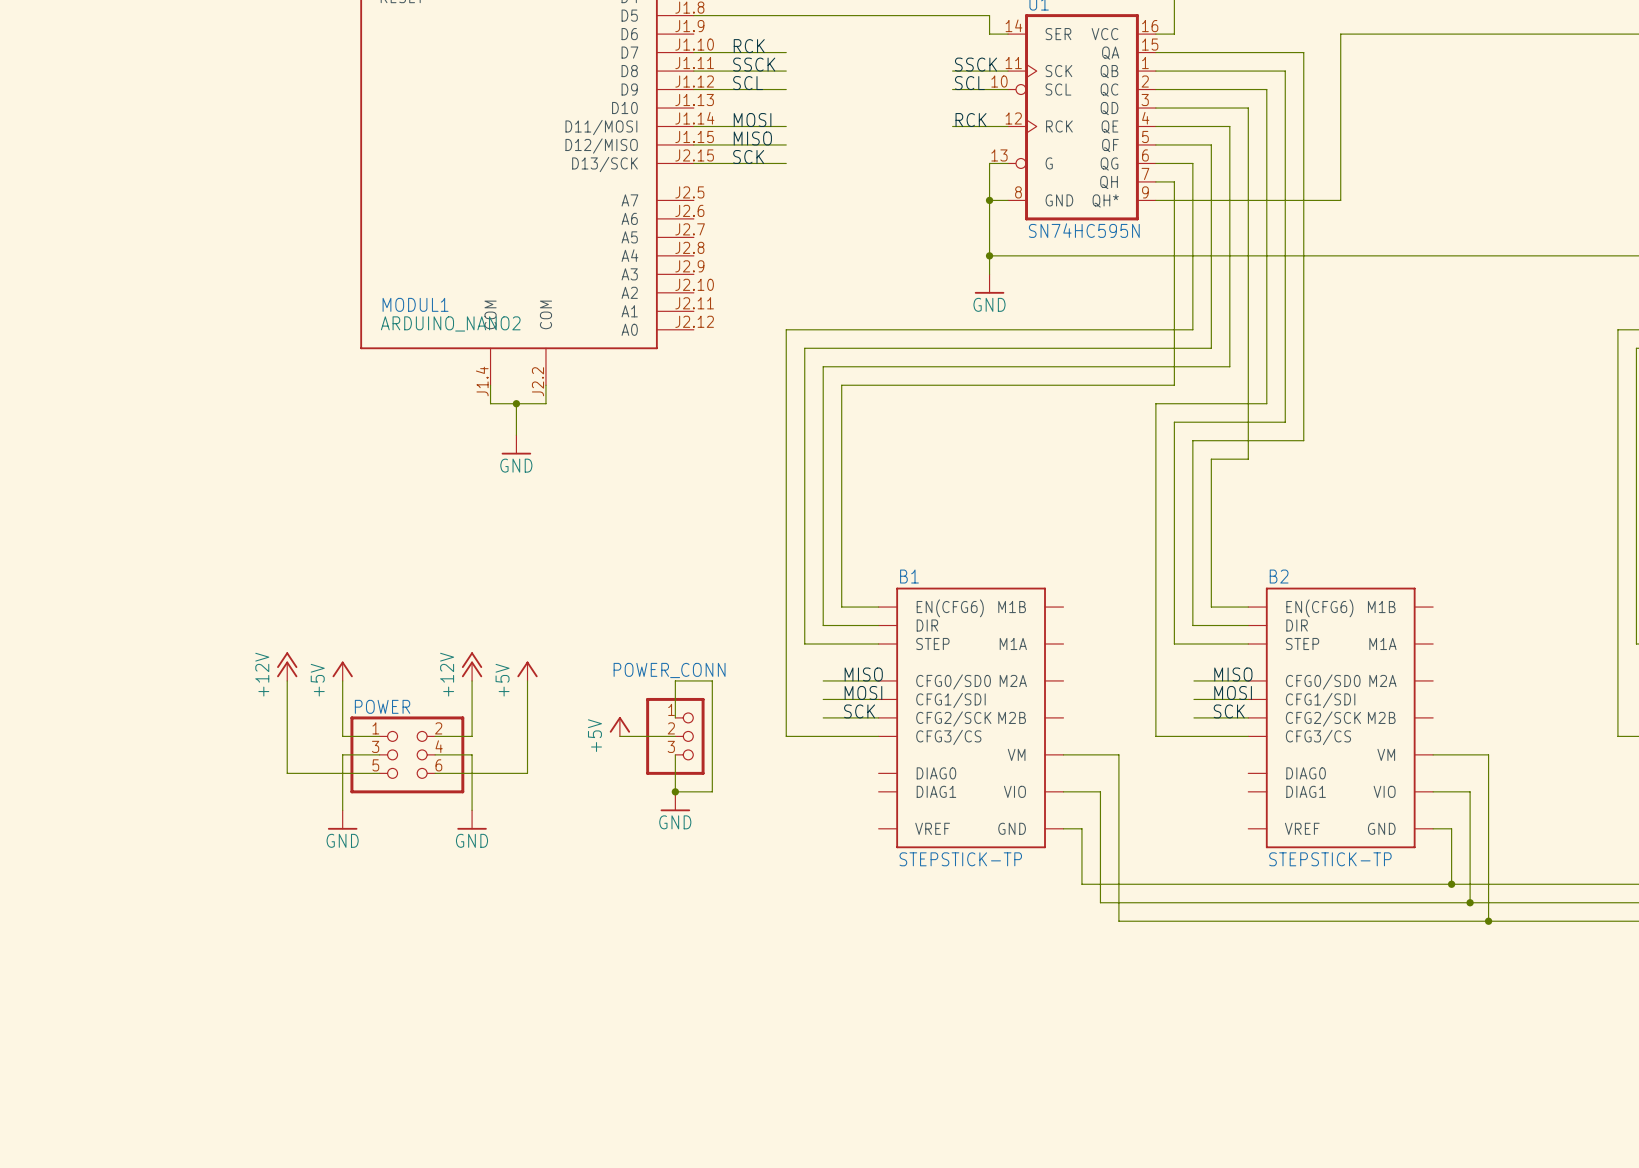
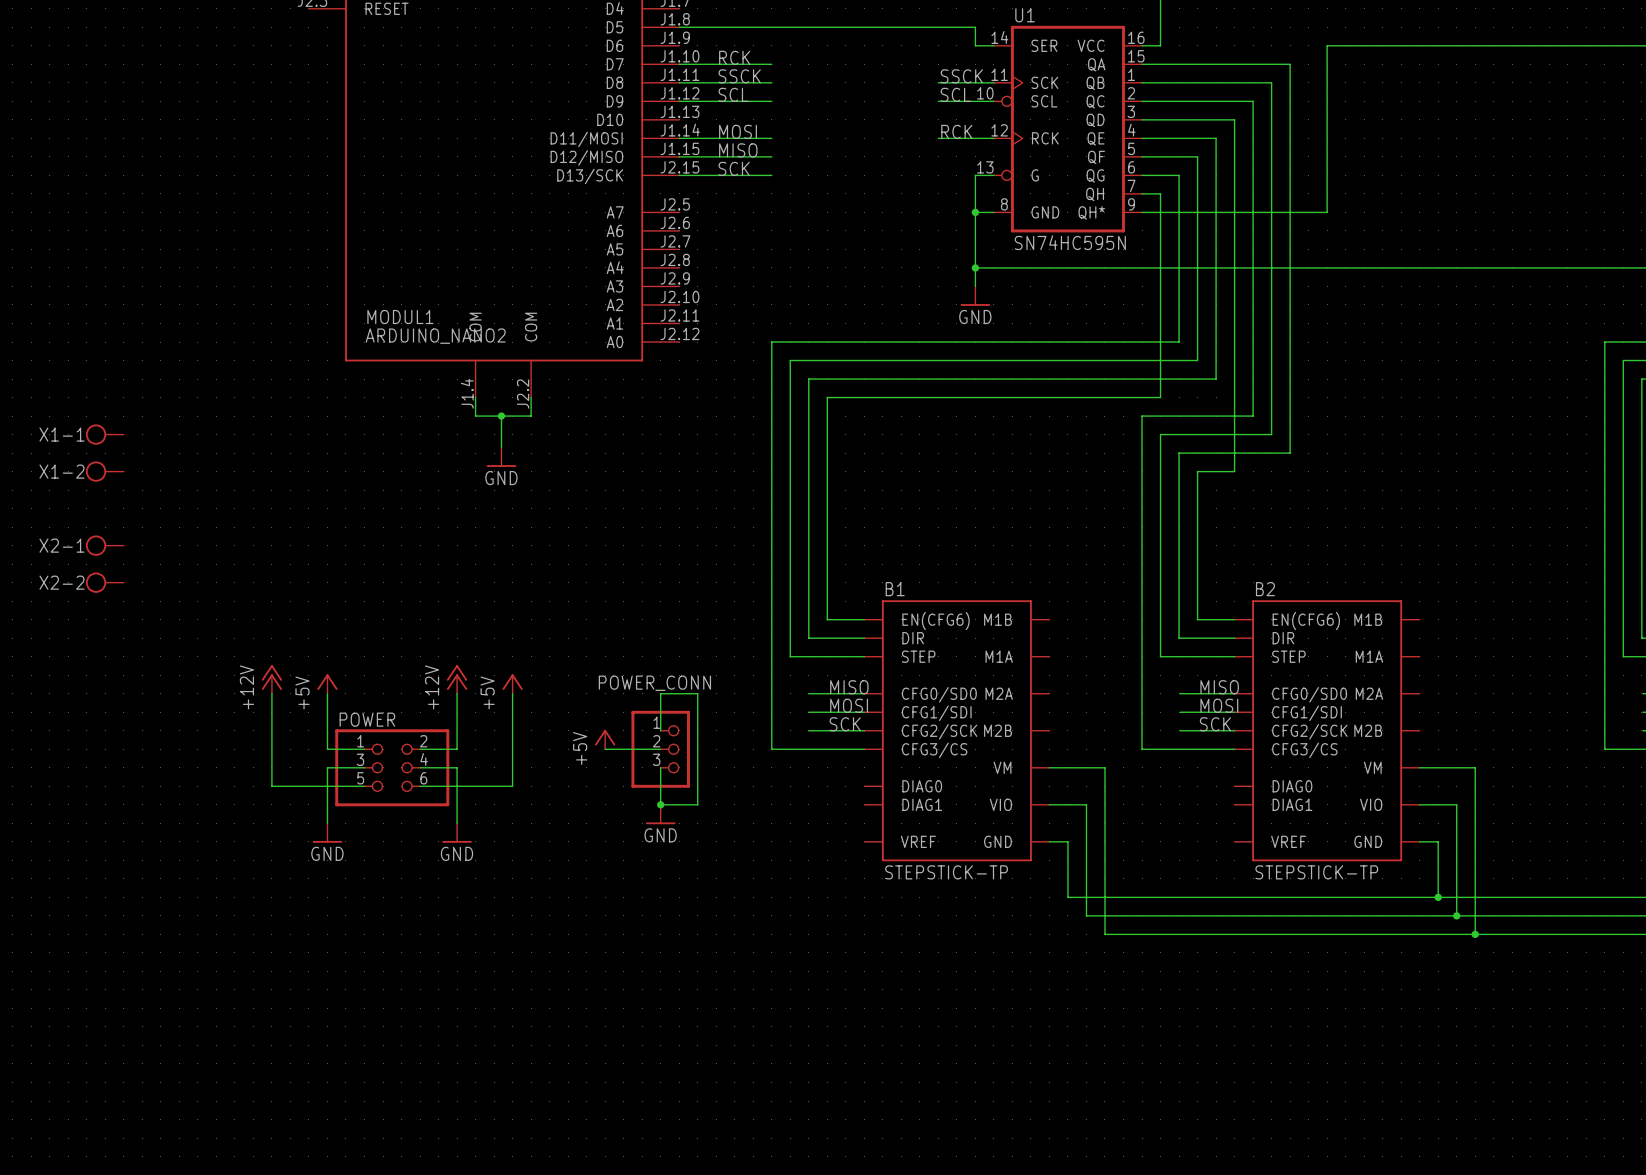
X1-1: none -> (104, 434)
X1-2: none -> (104, 471)
X2-1: none -> (104, 545)
X2-2: none -> (104, 582)

